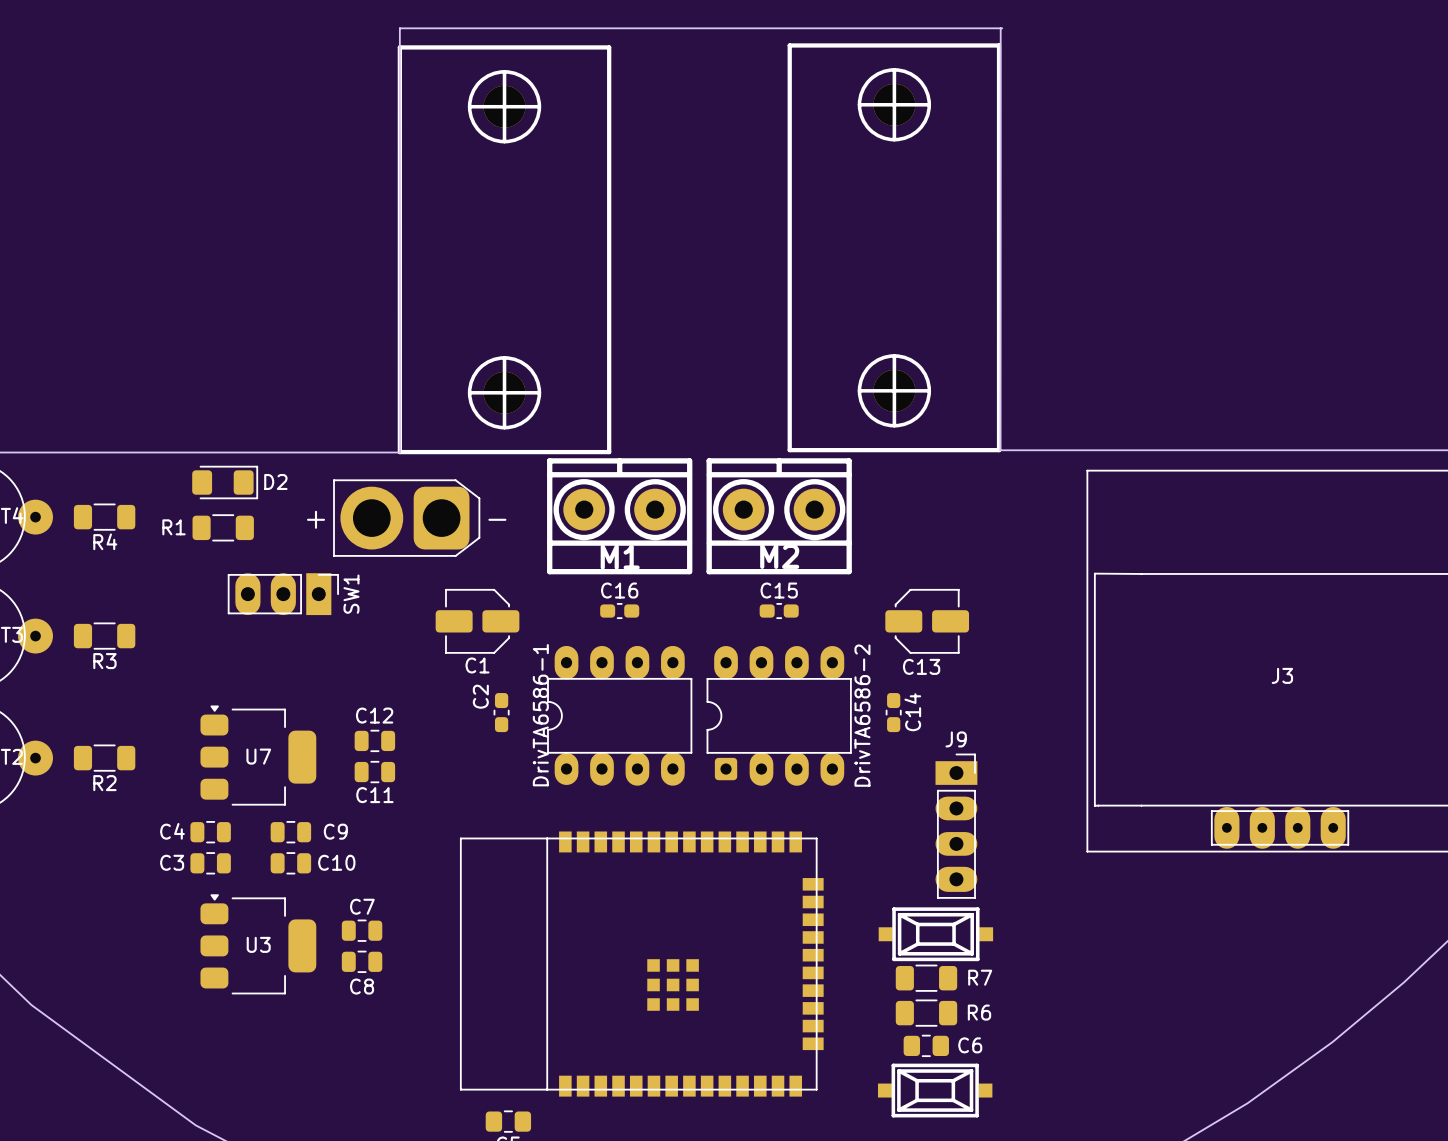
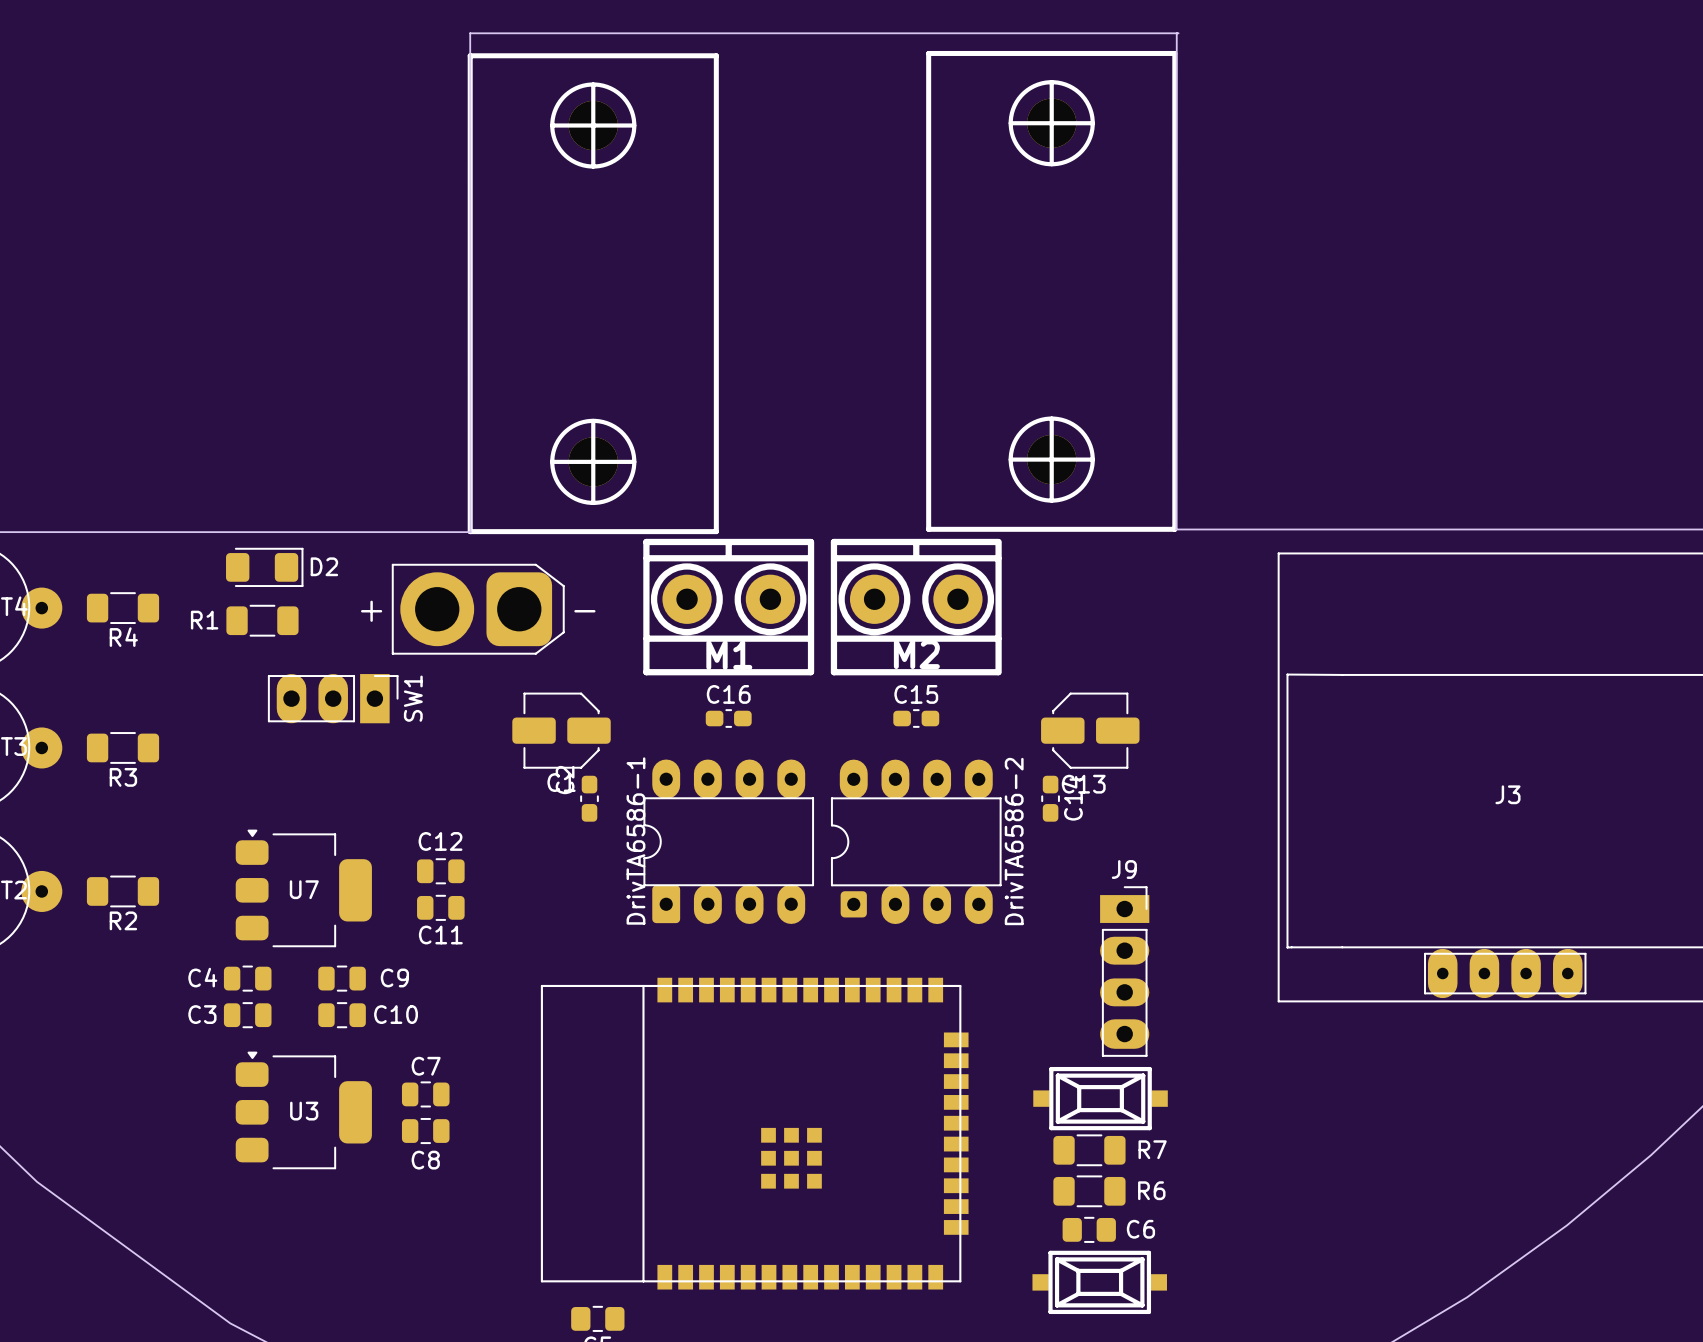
DrivTA6586-1 footprint: [547, 645, 693, 786] -> [643, 759, 815, 924]
C2 position: (501, 712) -> (589, 798)
C14 position: (893, 712) -> (1050, 798)

